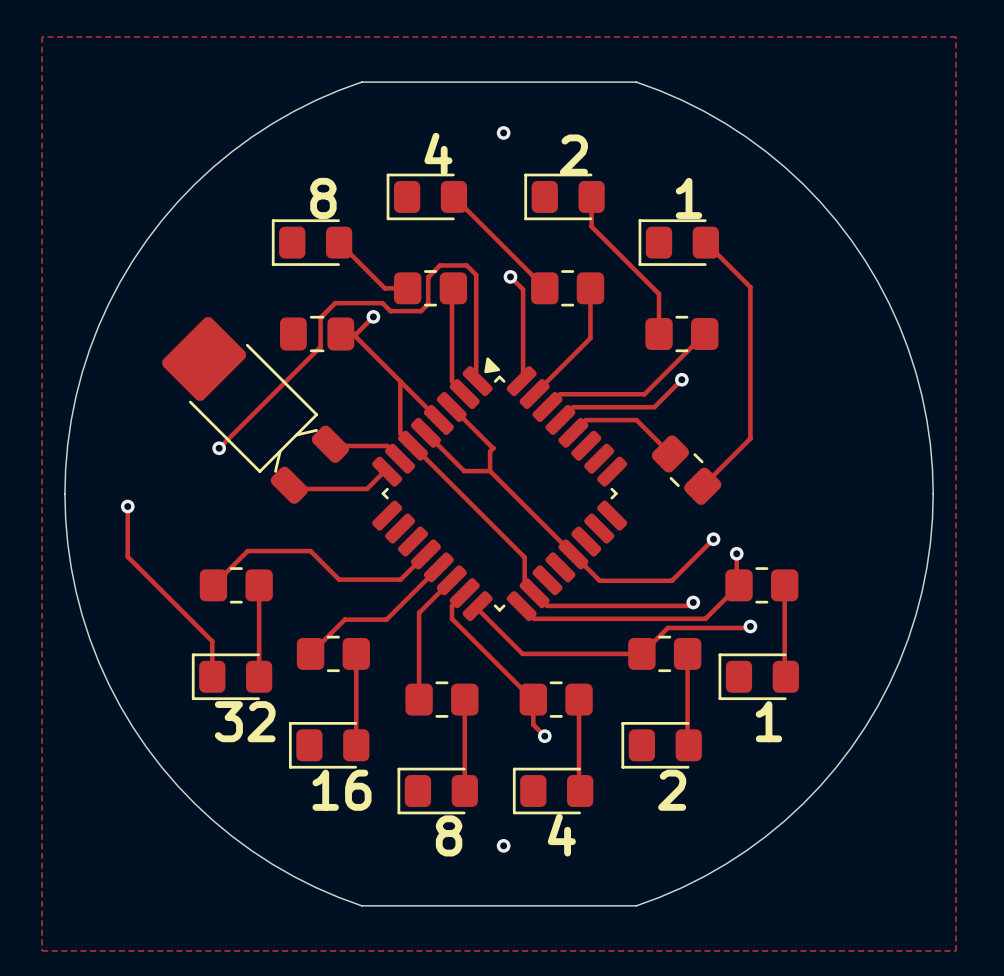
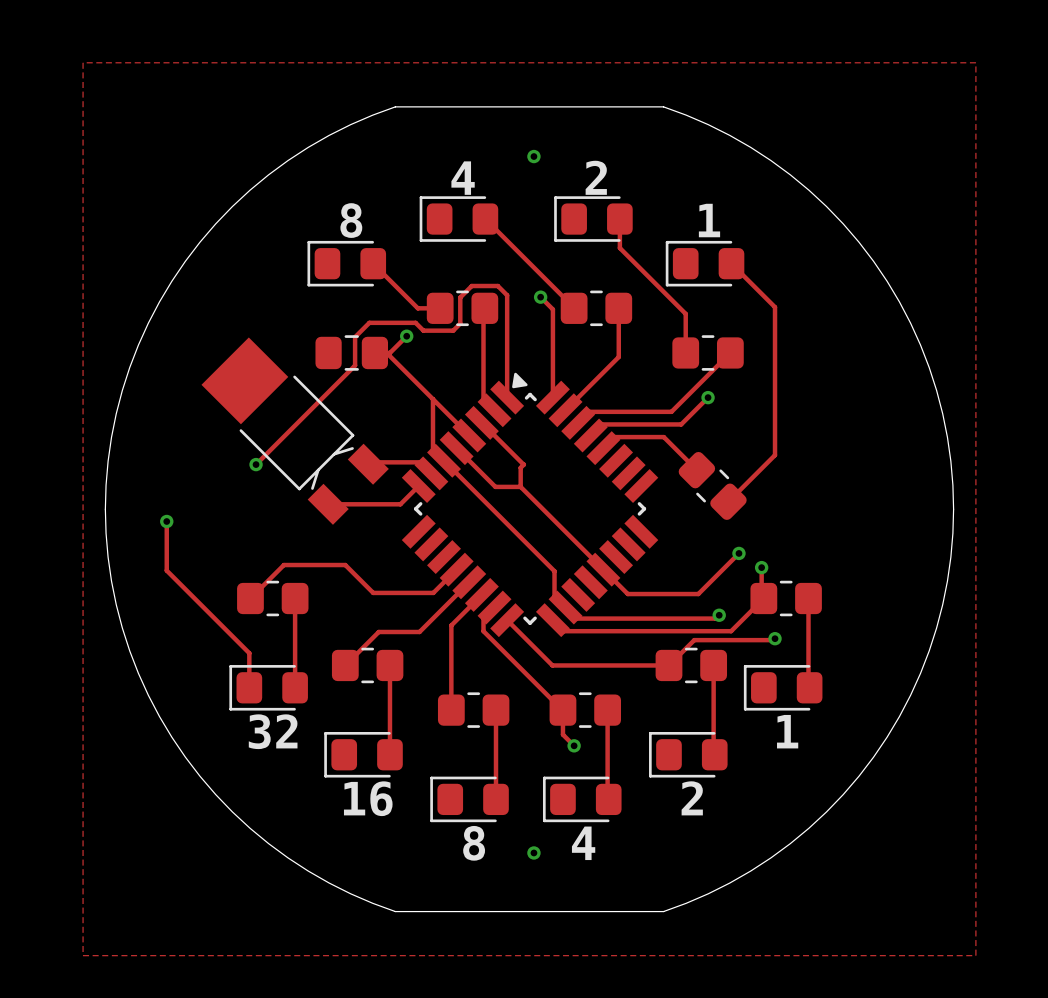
part footprint: [162, 316, 350, 504] -> [201, 337, 389, 525]
part footprint: [372, 357, 628, 622] -> [401, 372, 659, 638]

